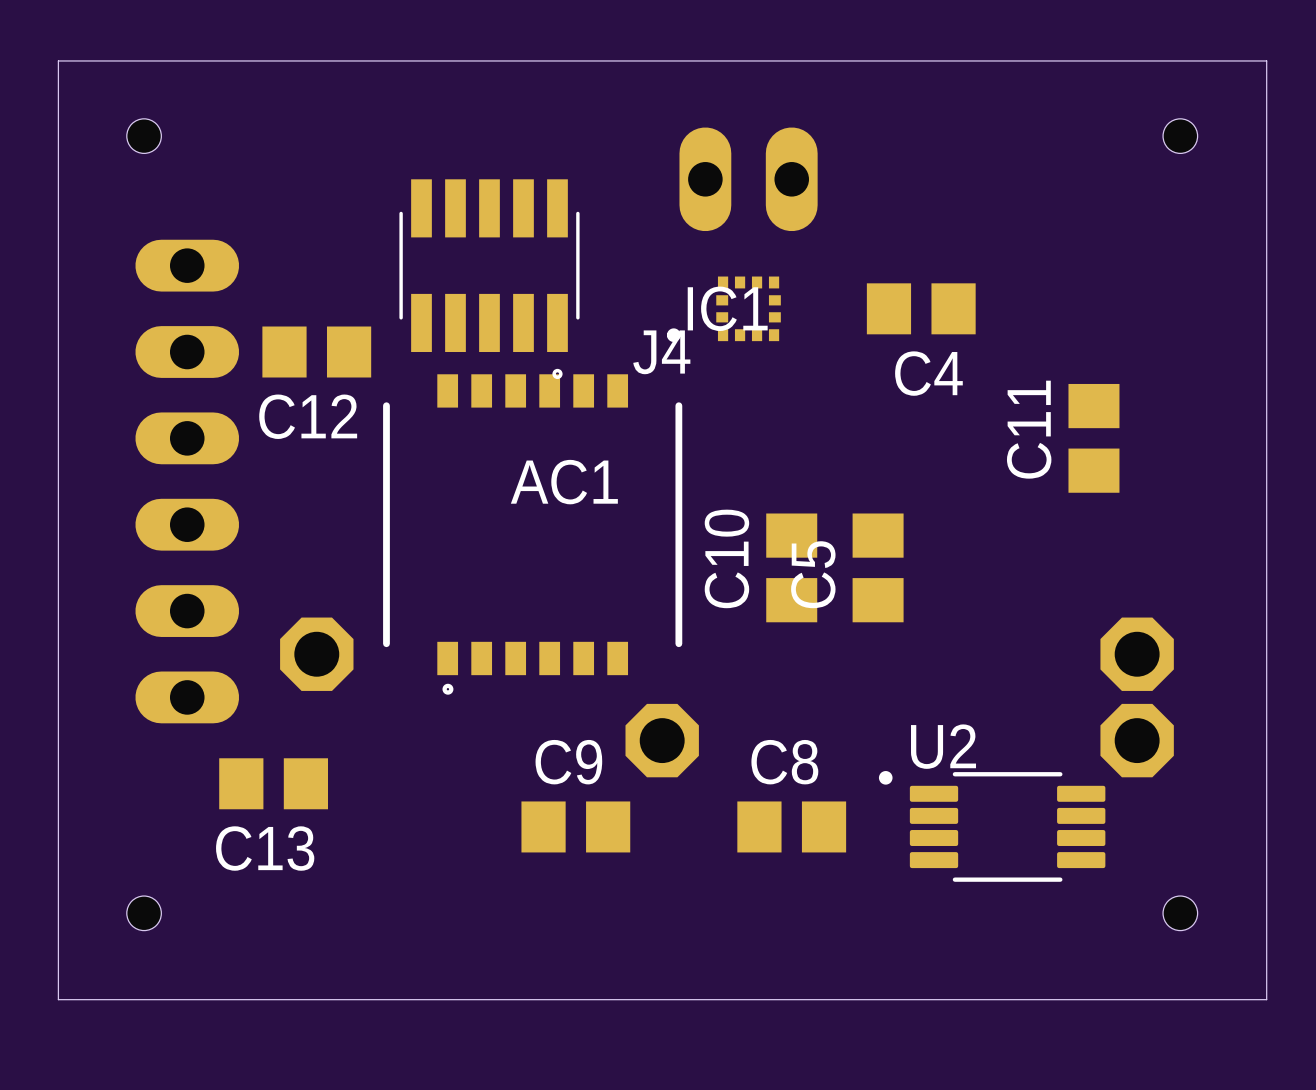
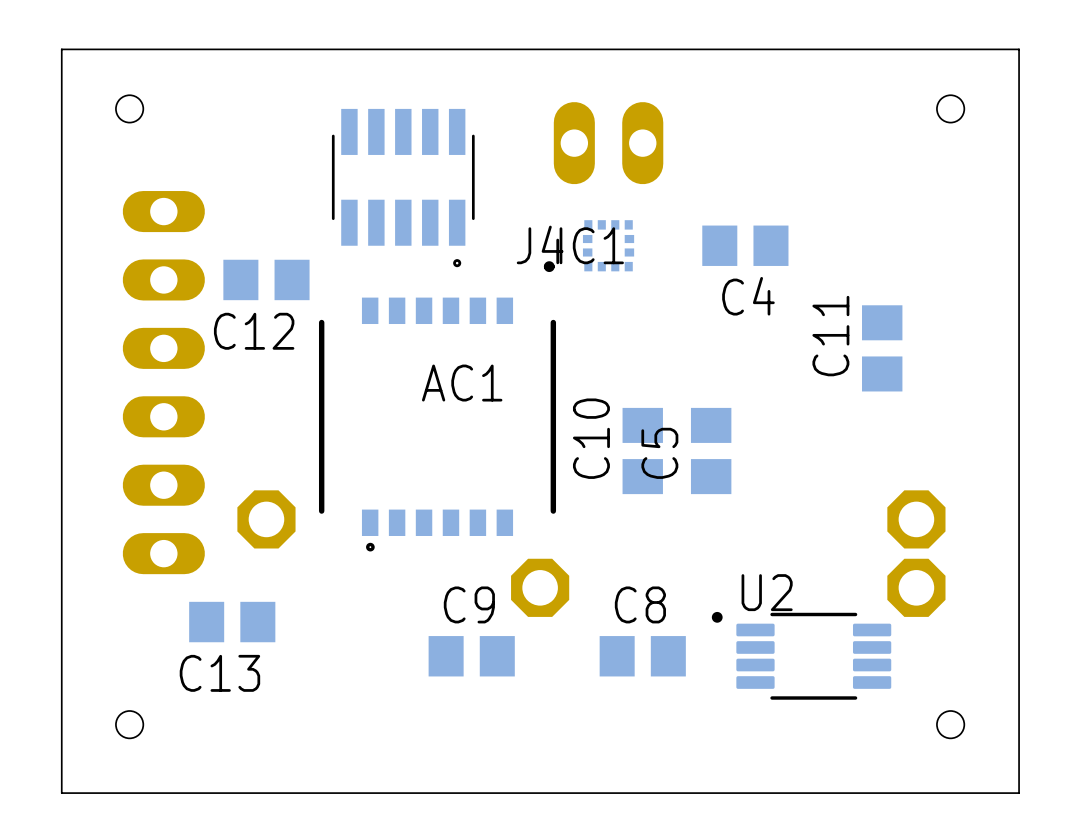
J4 position: (489, 279) -> (403, 188)

